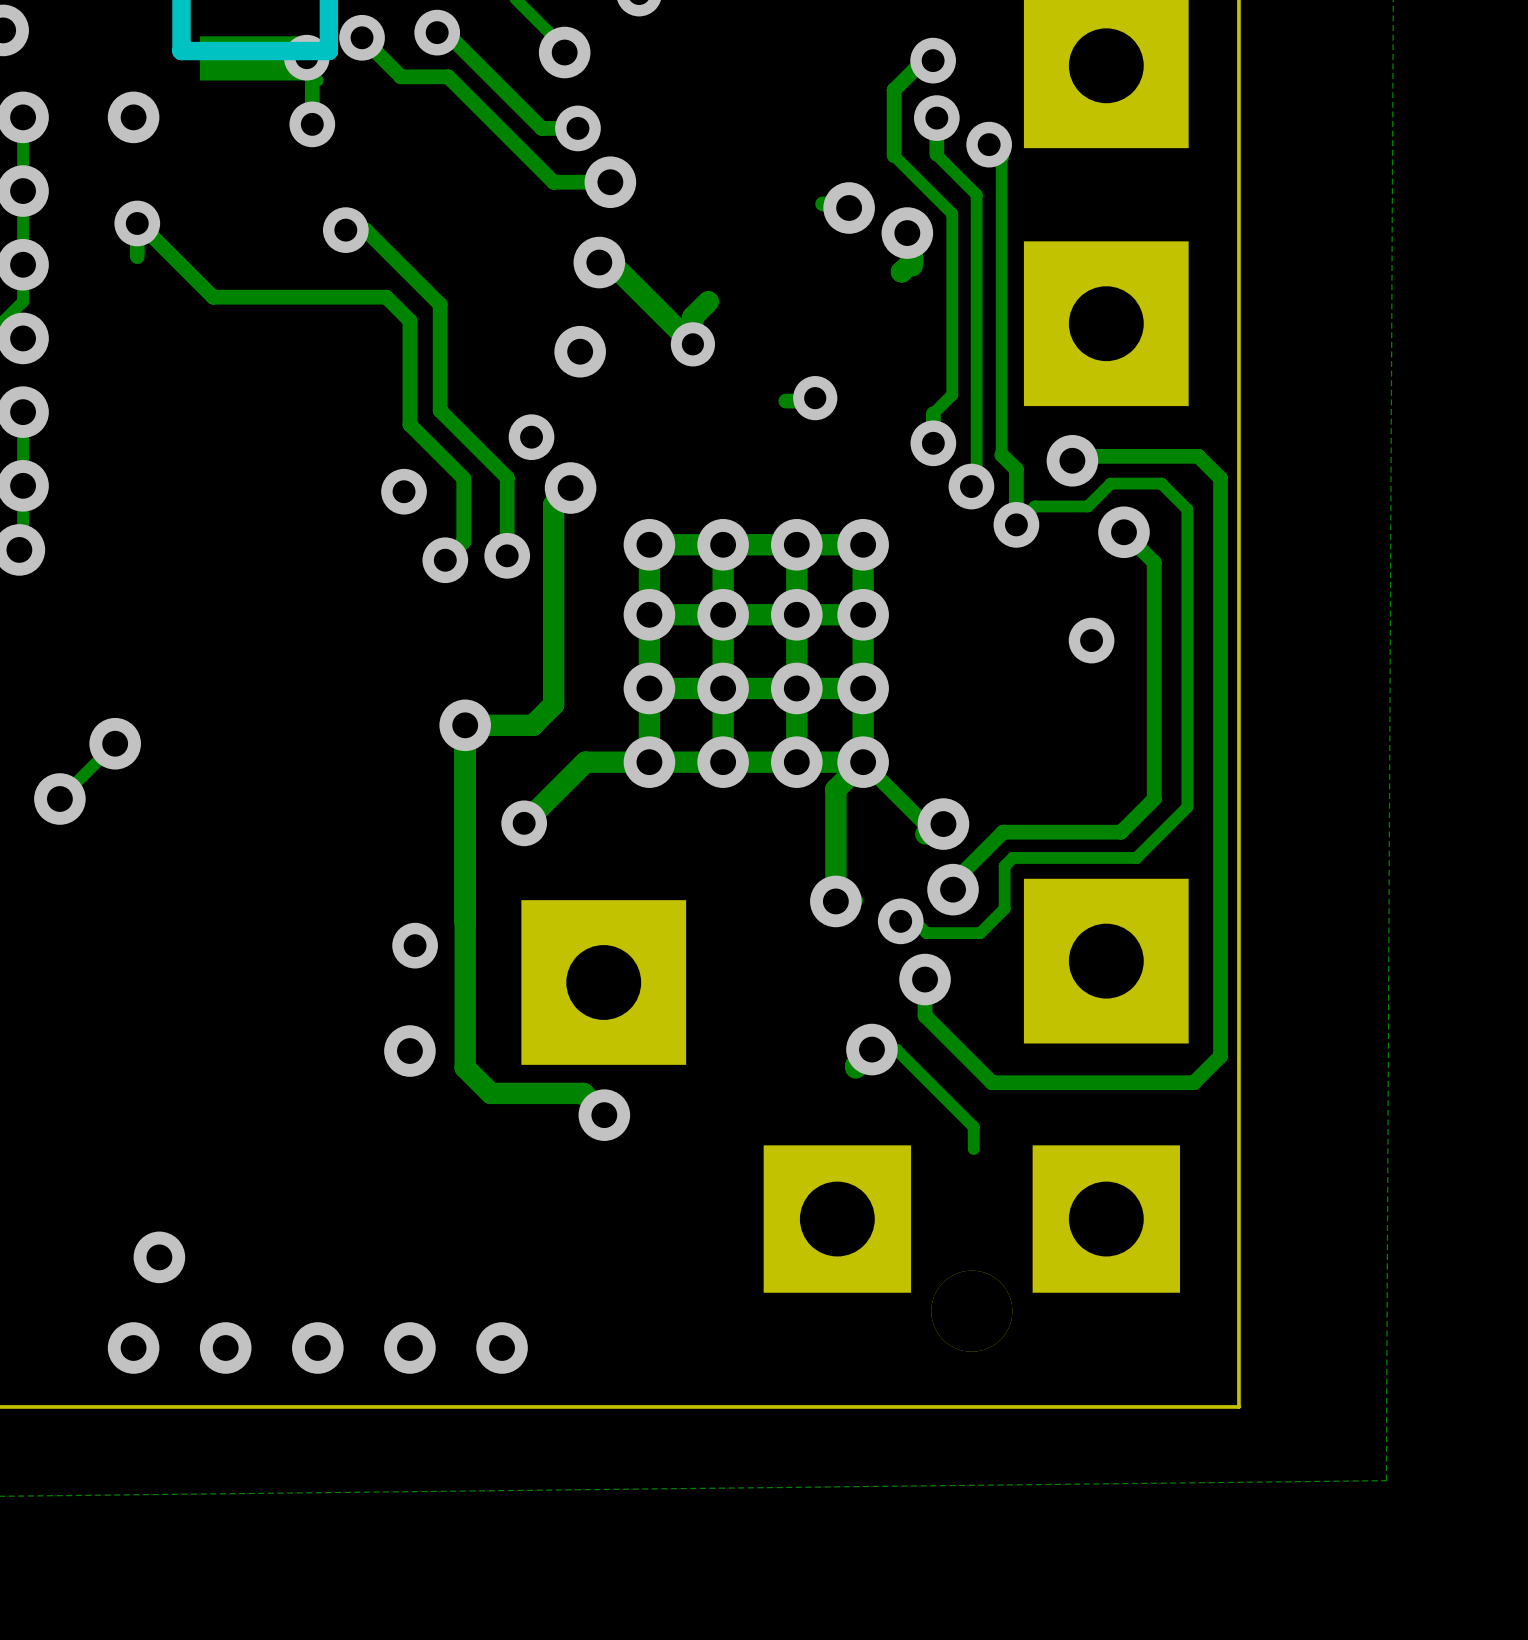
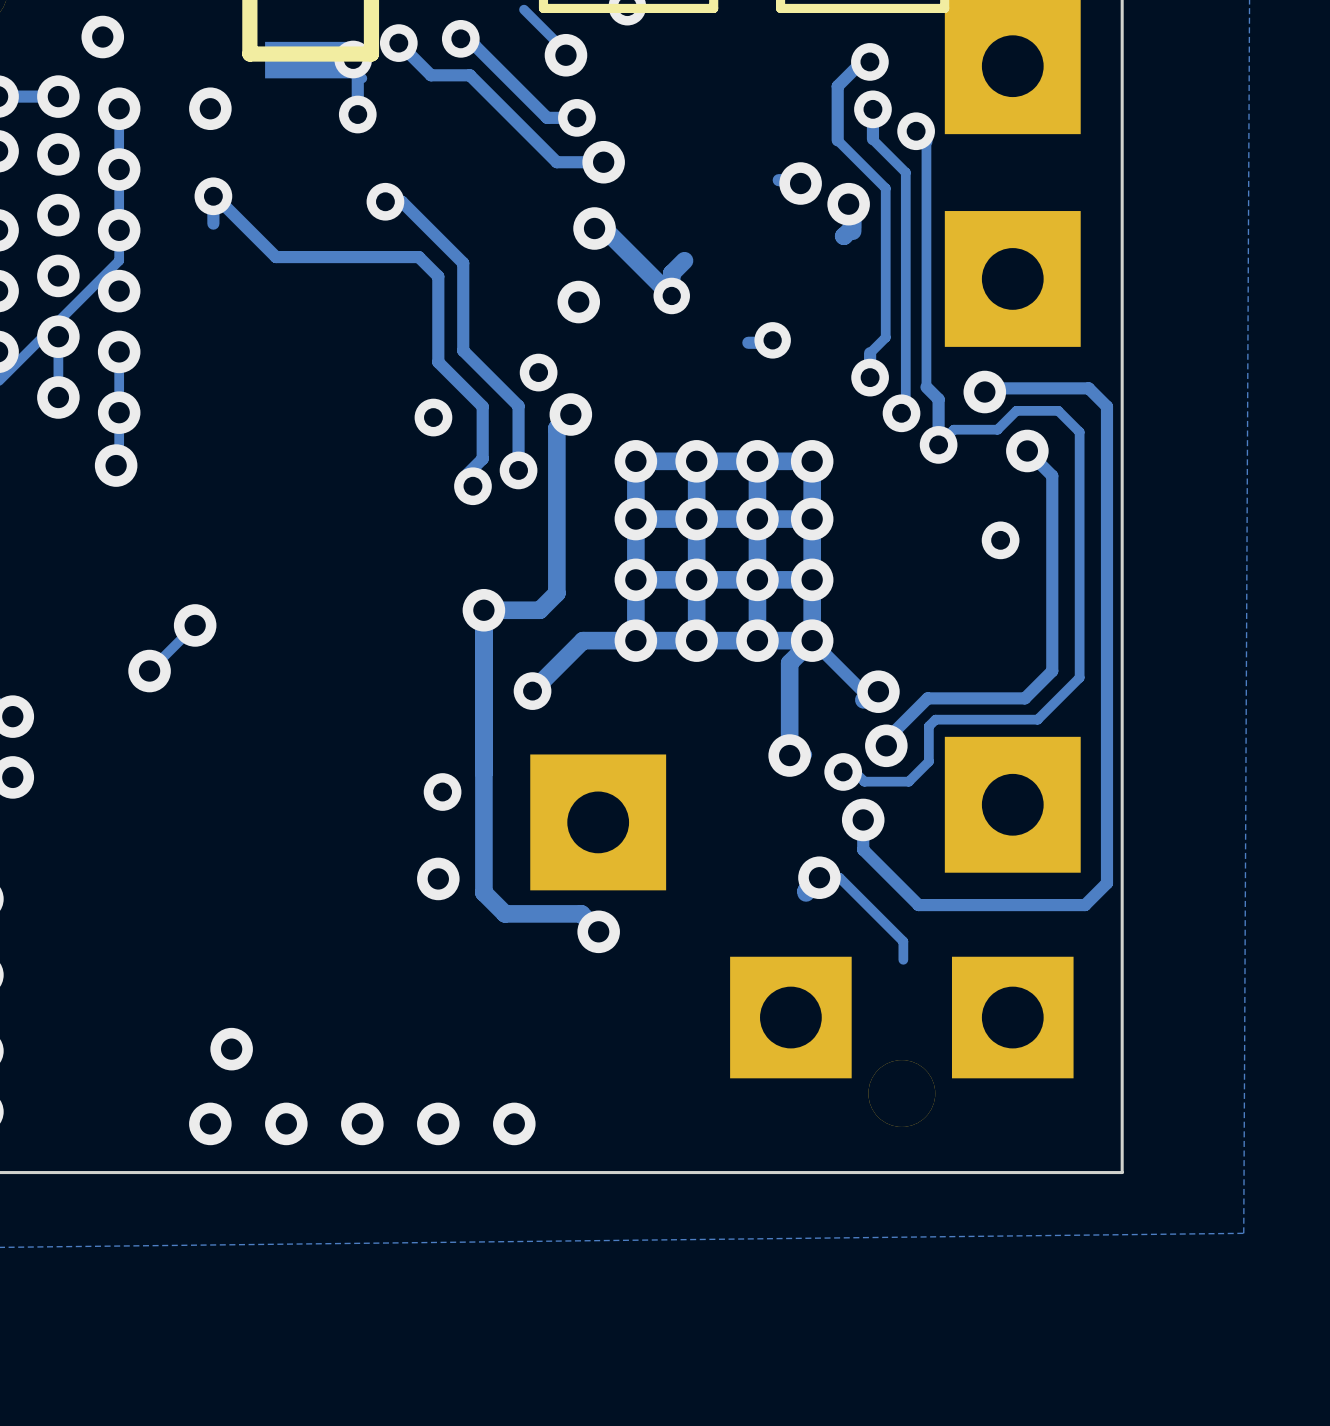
via position: (445, 560) -> (472, 486)

